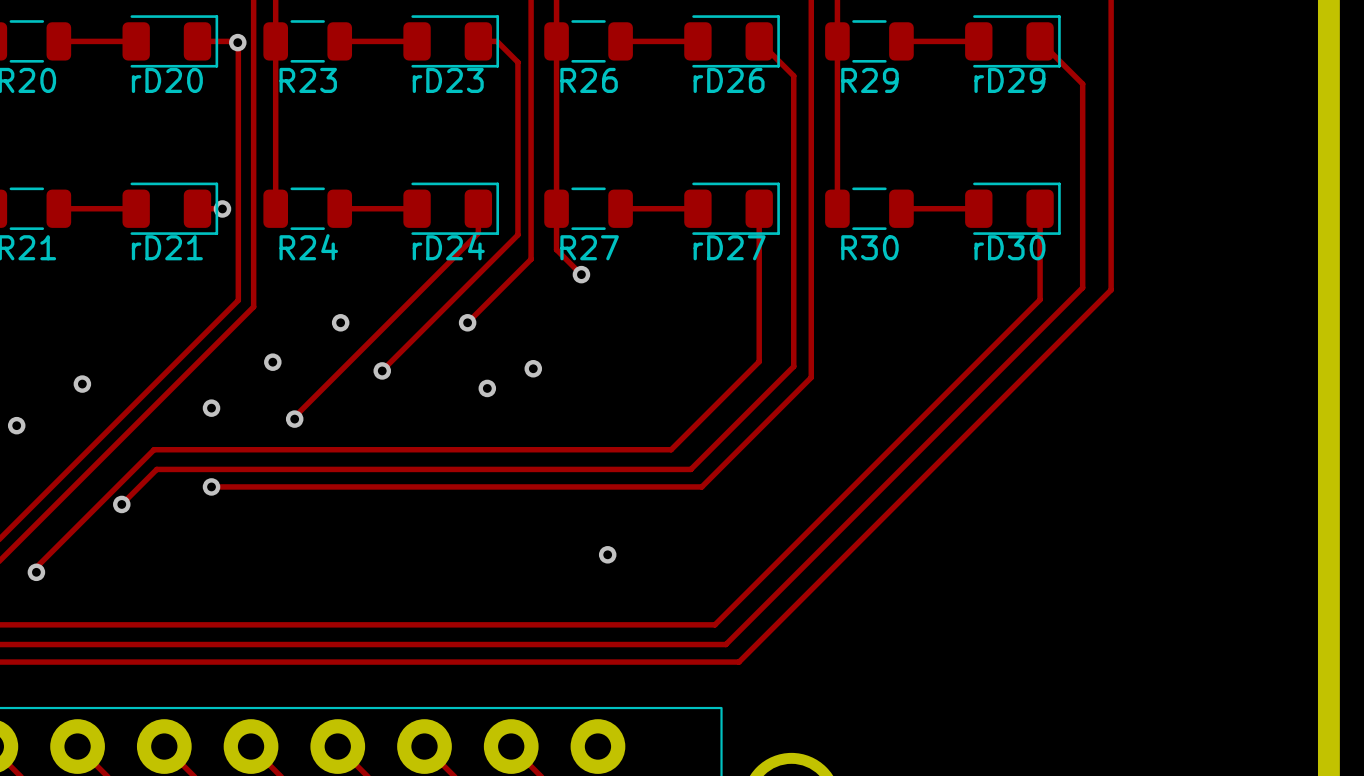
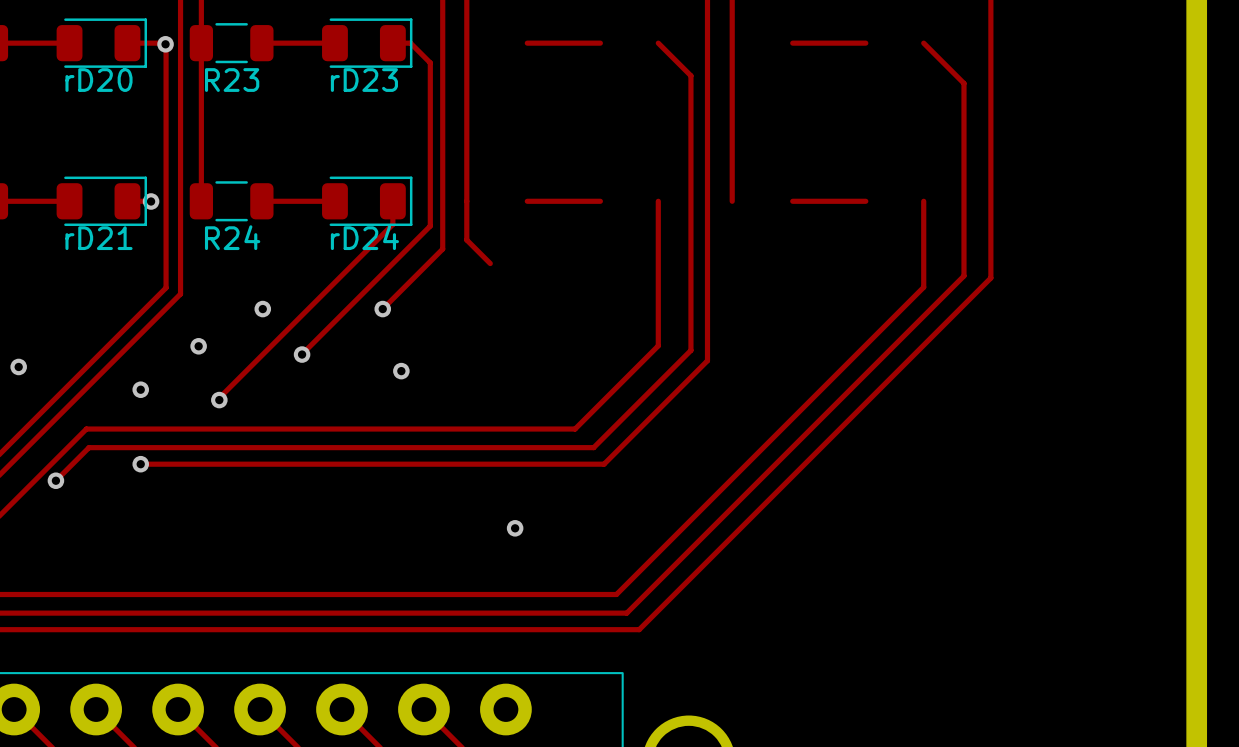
R26: (588, 41) -> none
rD26: (732, 41) -> none
R29: (869, 41) -> none
rD29: (1012, 41) -> none
R27: (588, 208) -> none
rD27: (732, 208) -> none
R30: (869, 208) -> none
rD30: (1012, 208) -> none
via: (581, 274) -> none
via: (533, 368) -> none

